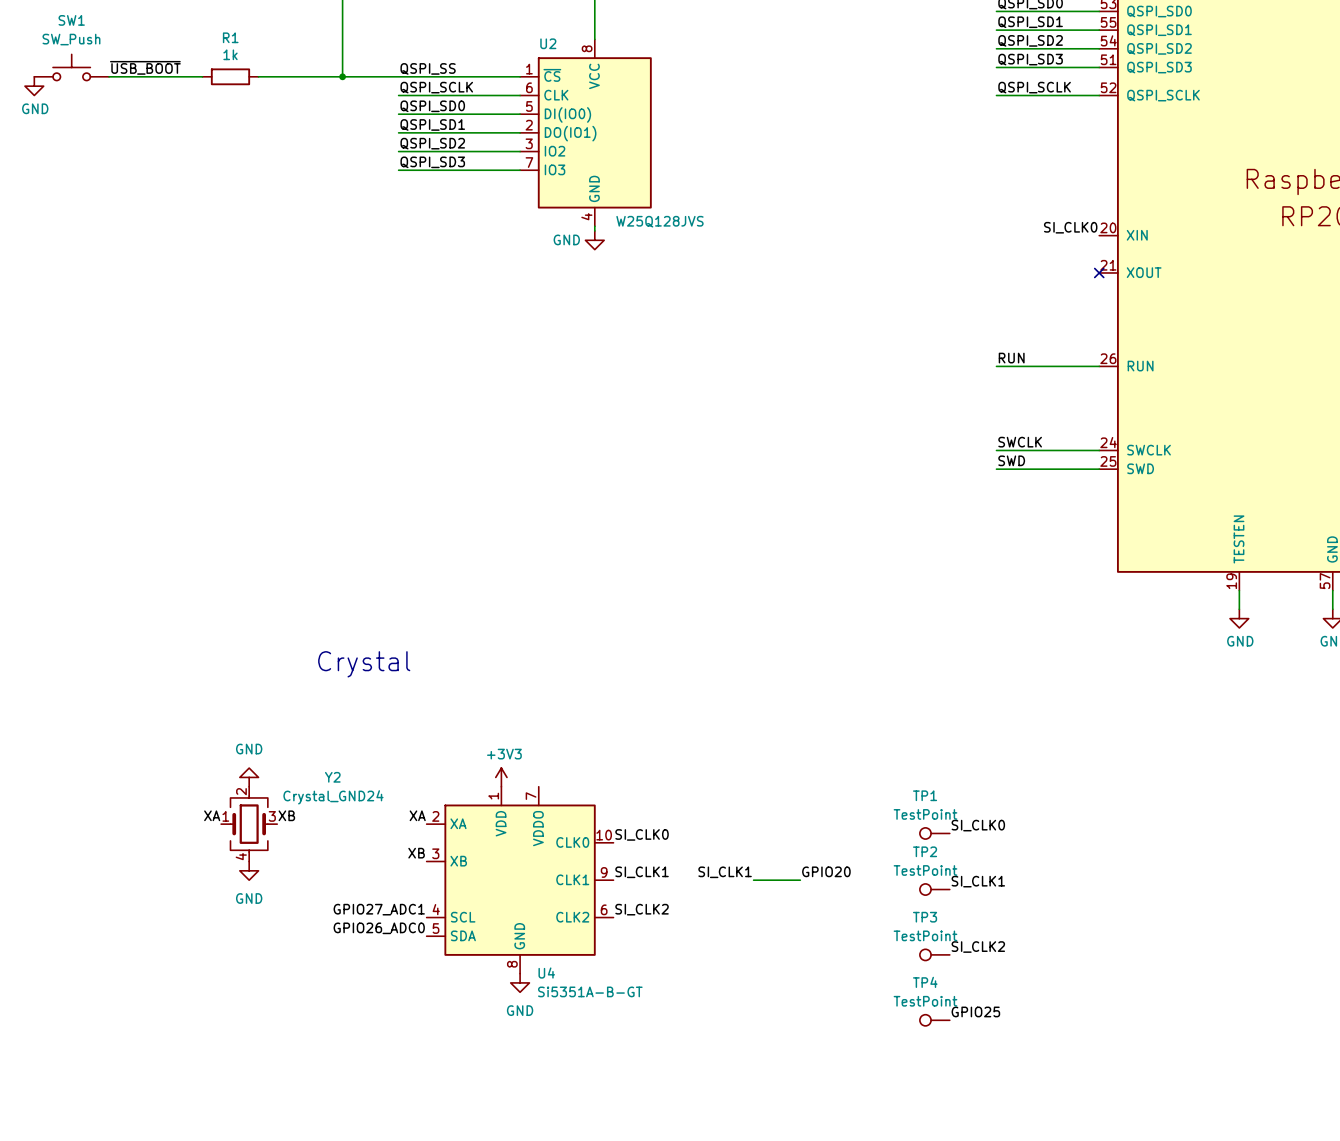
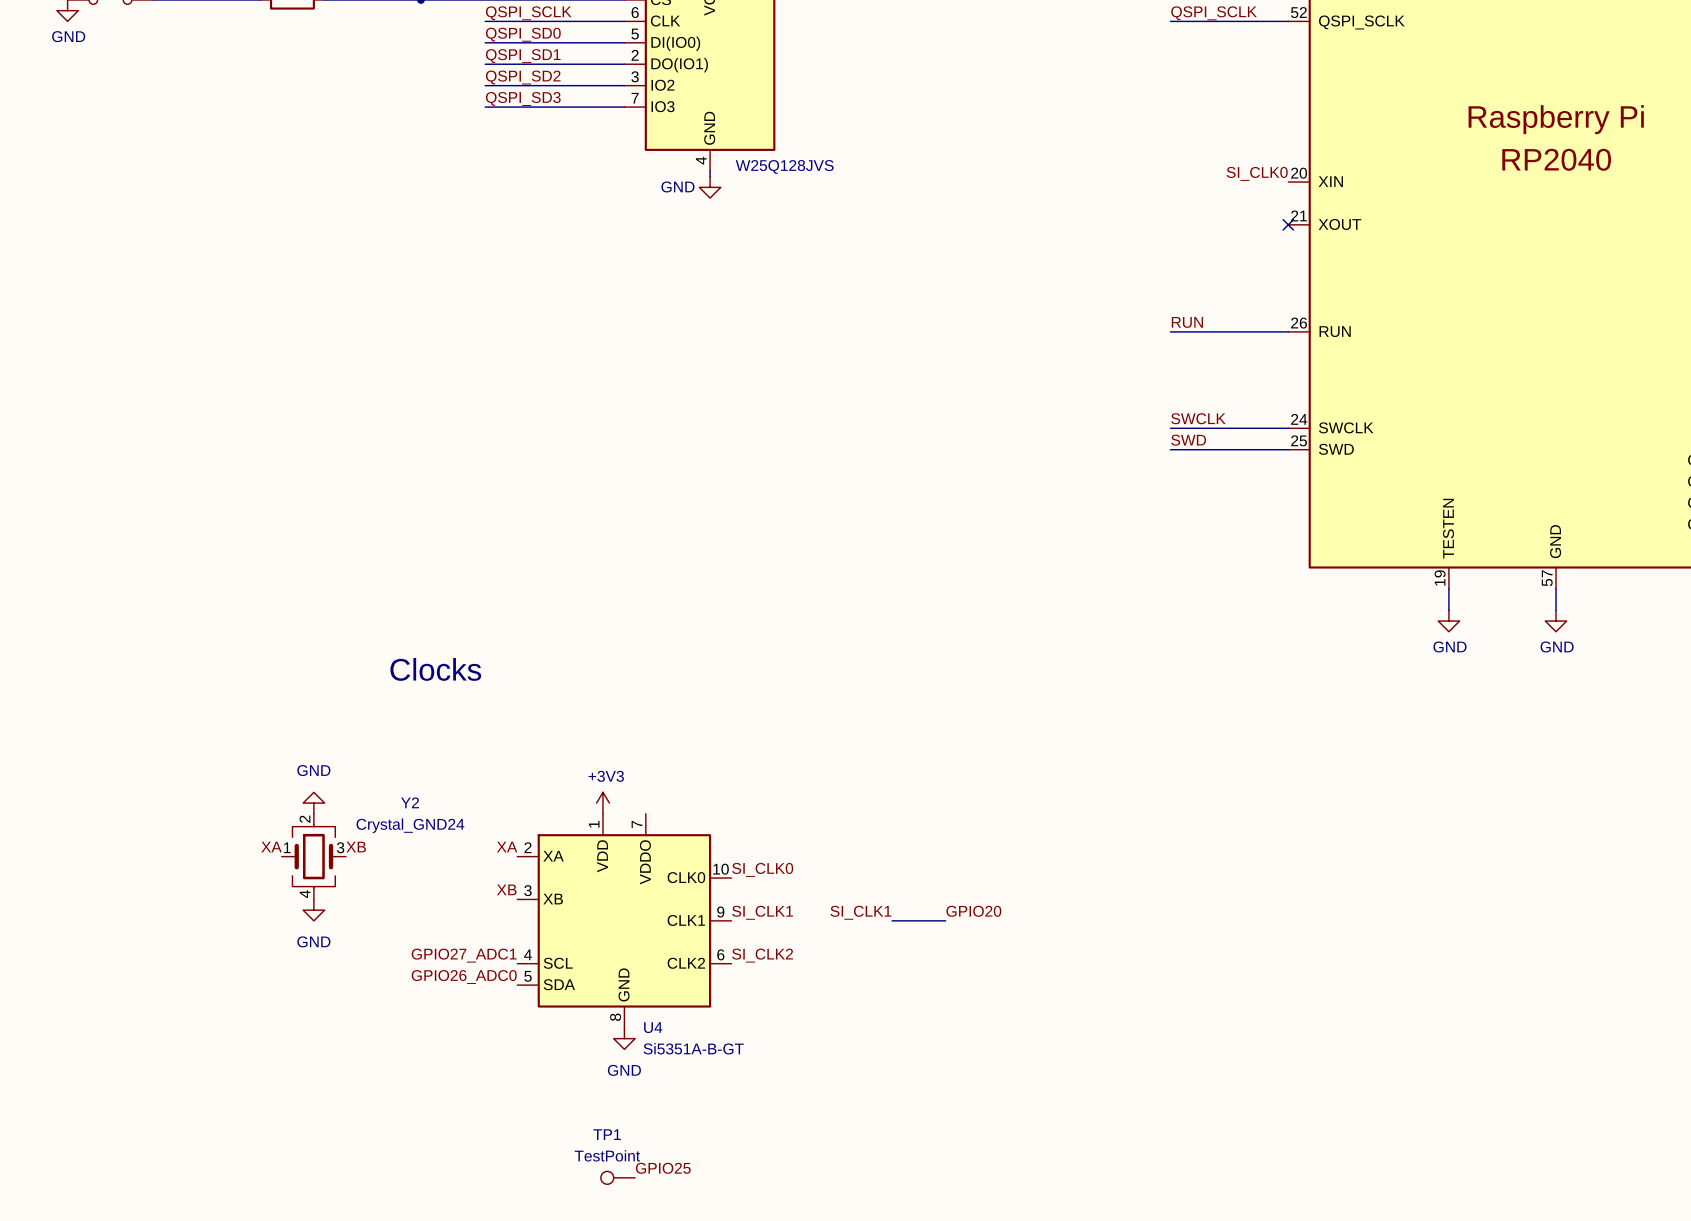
text: Crystal (364, 664) -> Clocks (435, 669)
label: SI_CLK0 (978, 825) -> none
TP1 position: (934, 833) -> (617, 1177)
label: SI_CLK1 (978, 881) -> none
TP2: TestPoint (934, 889) -> none
label: SI_CLK2 (978, 947) -> none
TP3: TestPoint (934, 954) -> none
label: GPIO25 (975, 1011) -> none
TP4: TestPoint (934, 1020) -> none
label: none -> GPIO25 (663, 1168)

